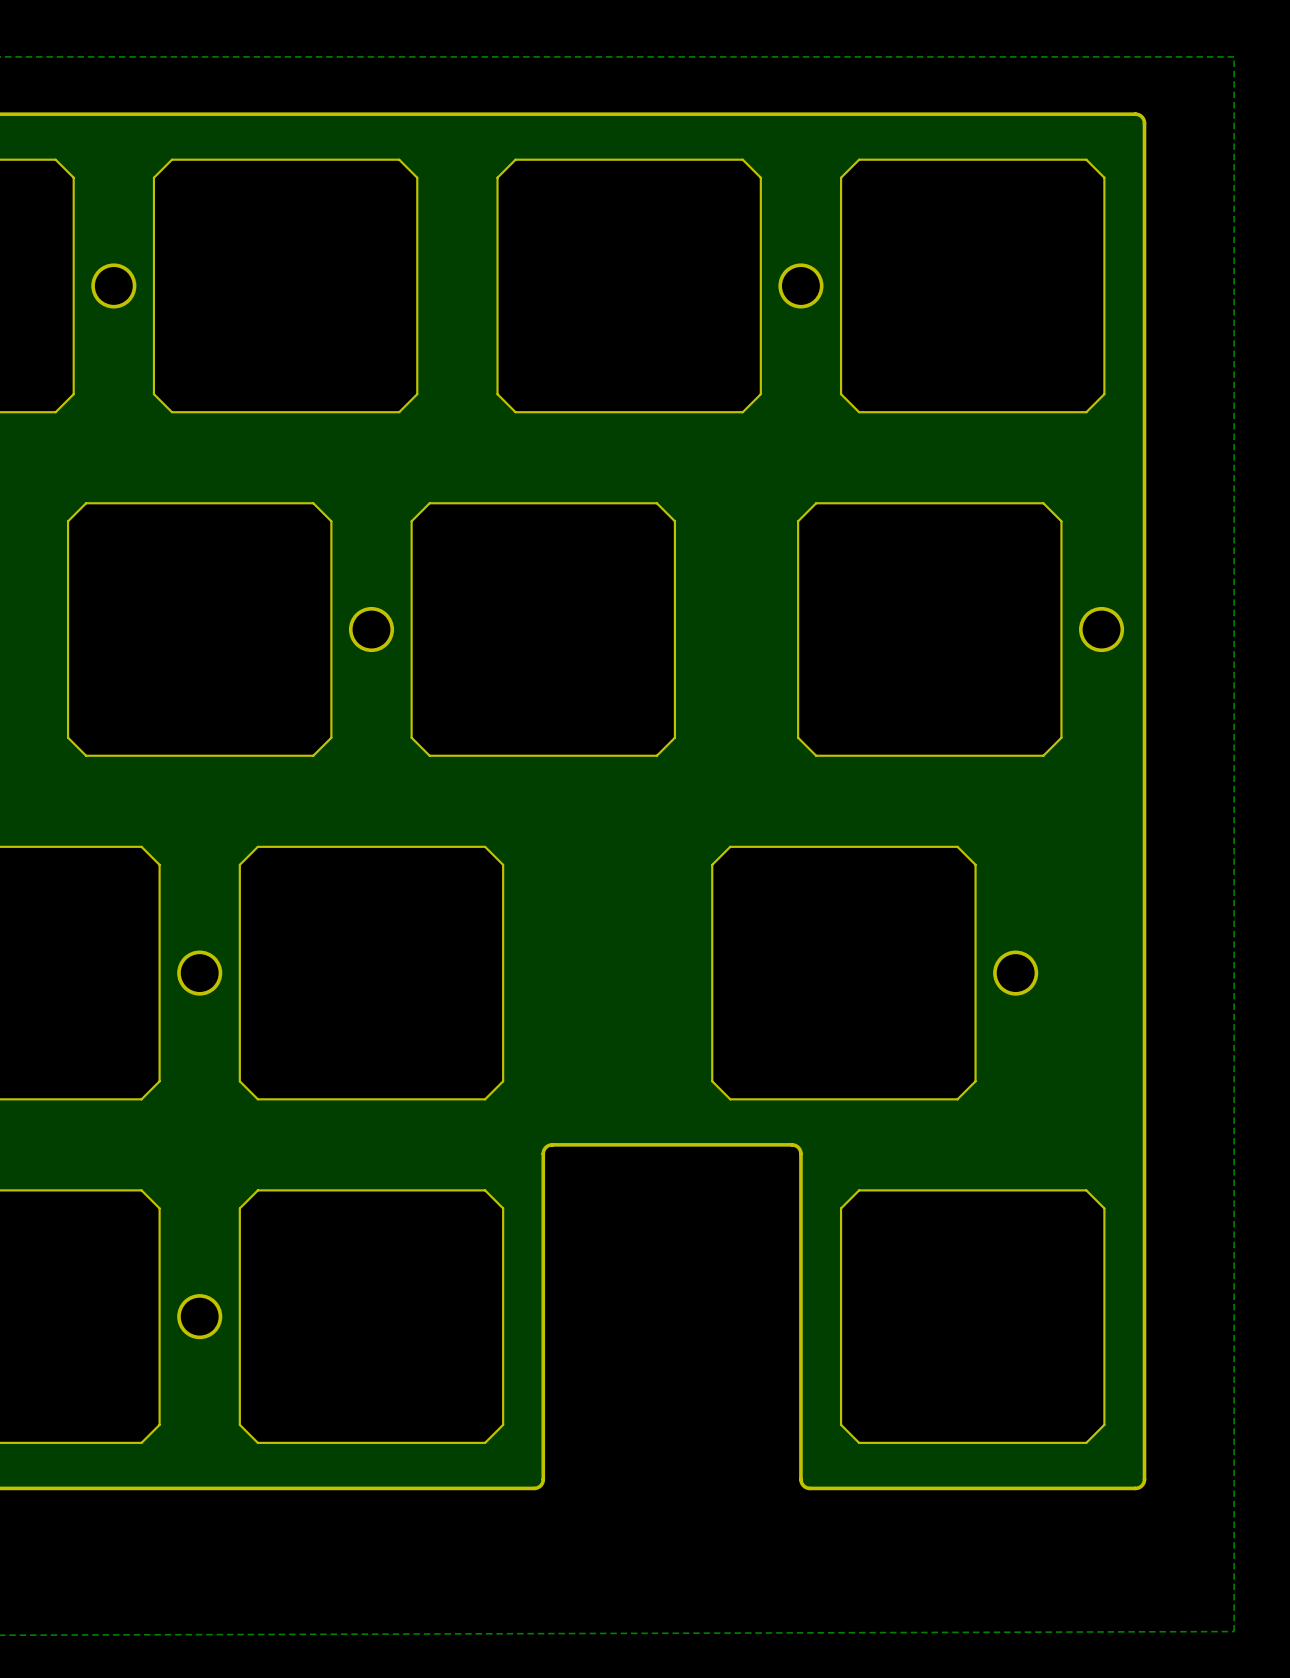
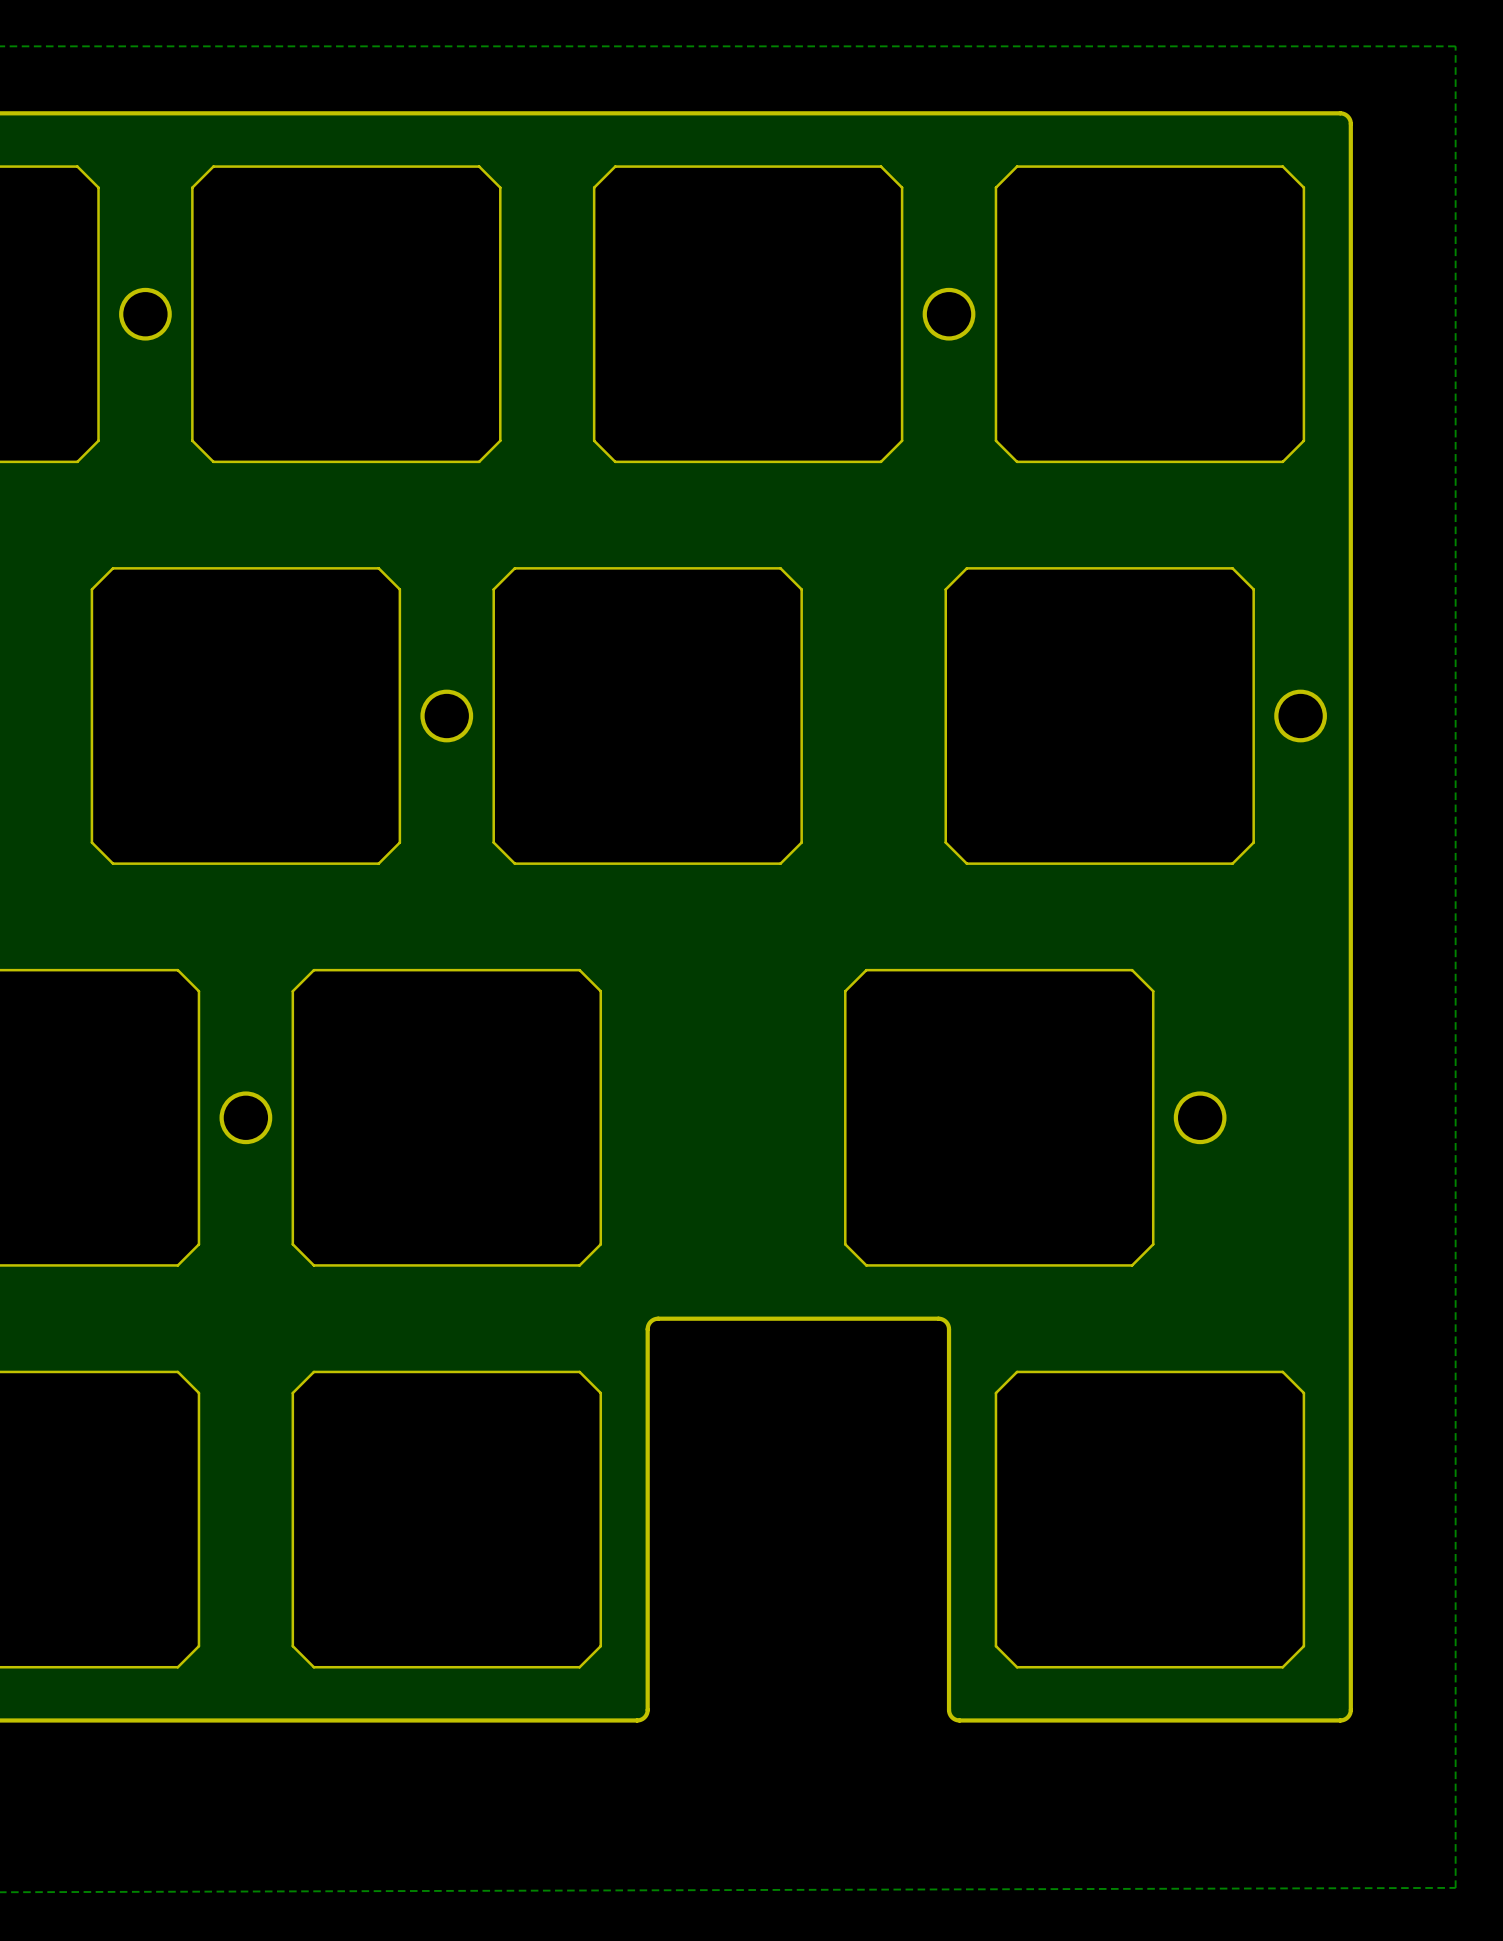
round board edge: [177, 1294, 223, 1340] -> none

